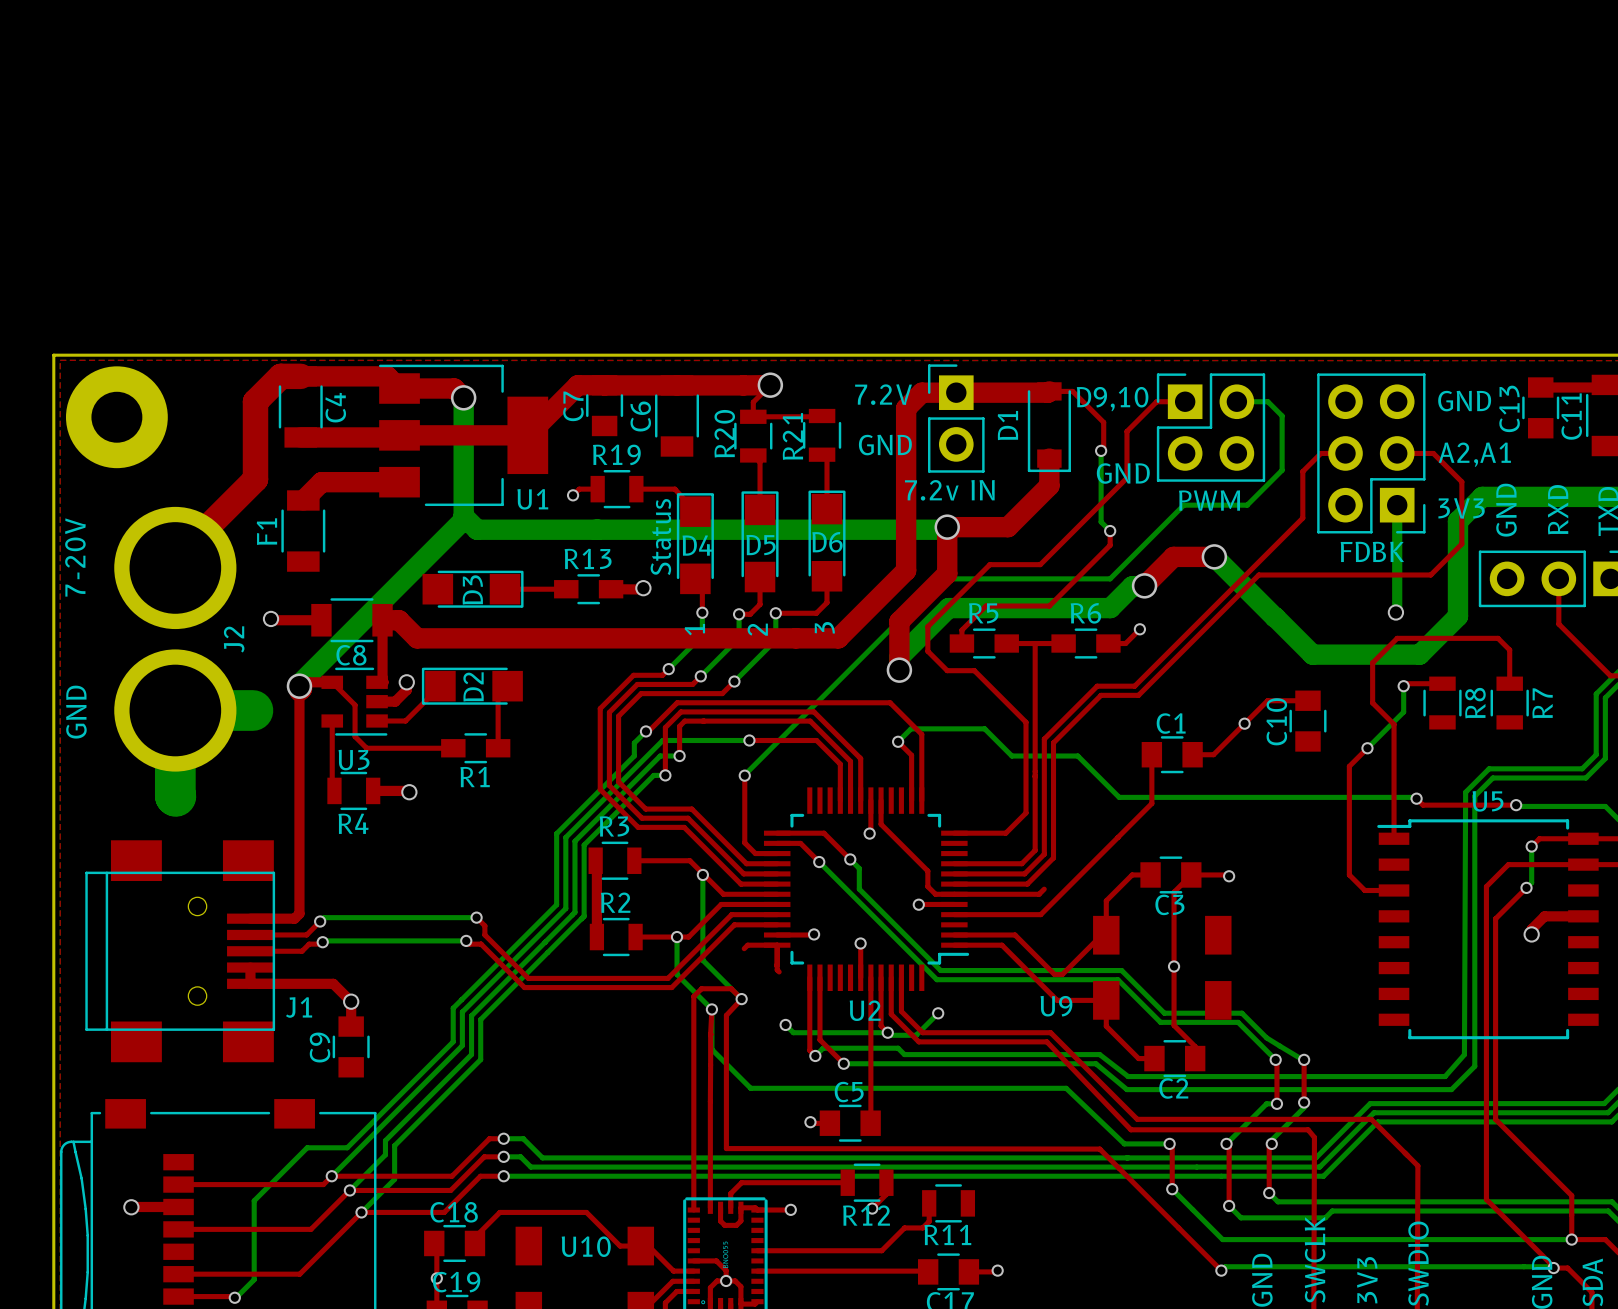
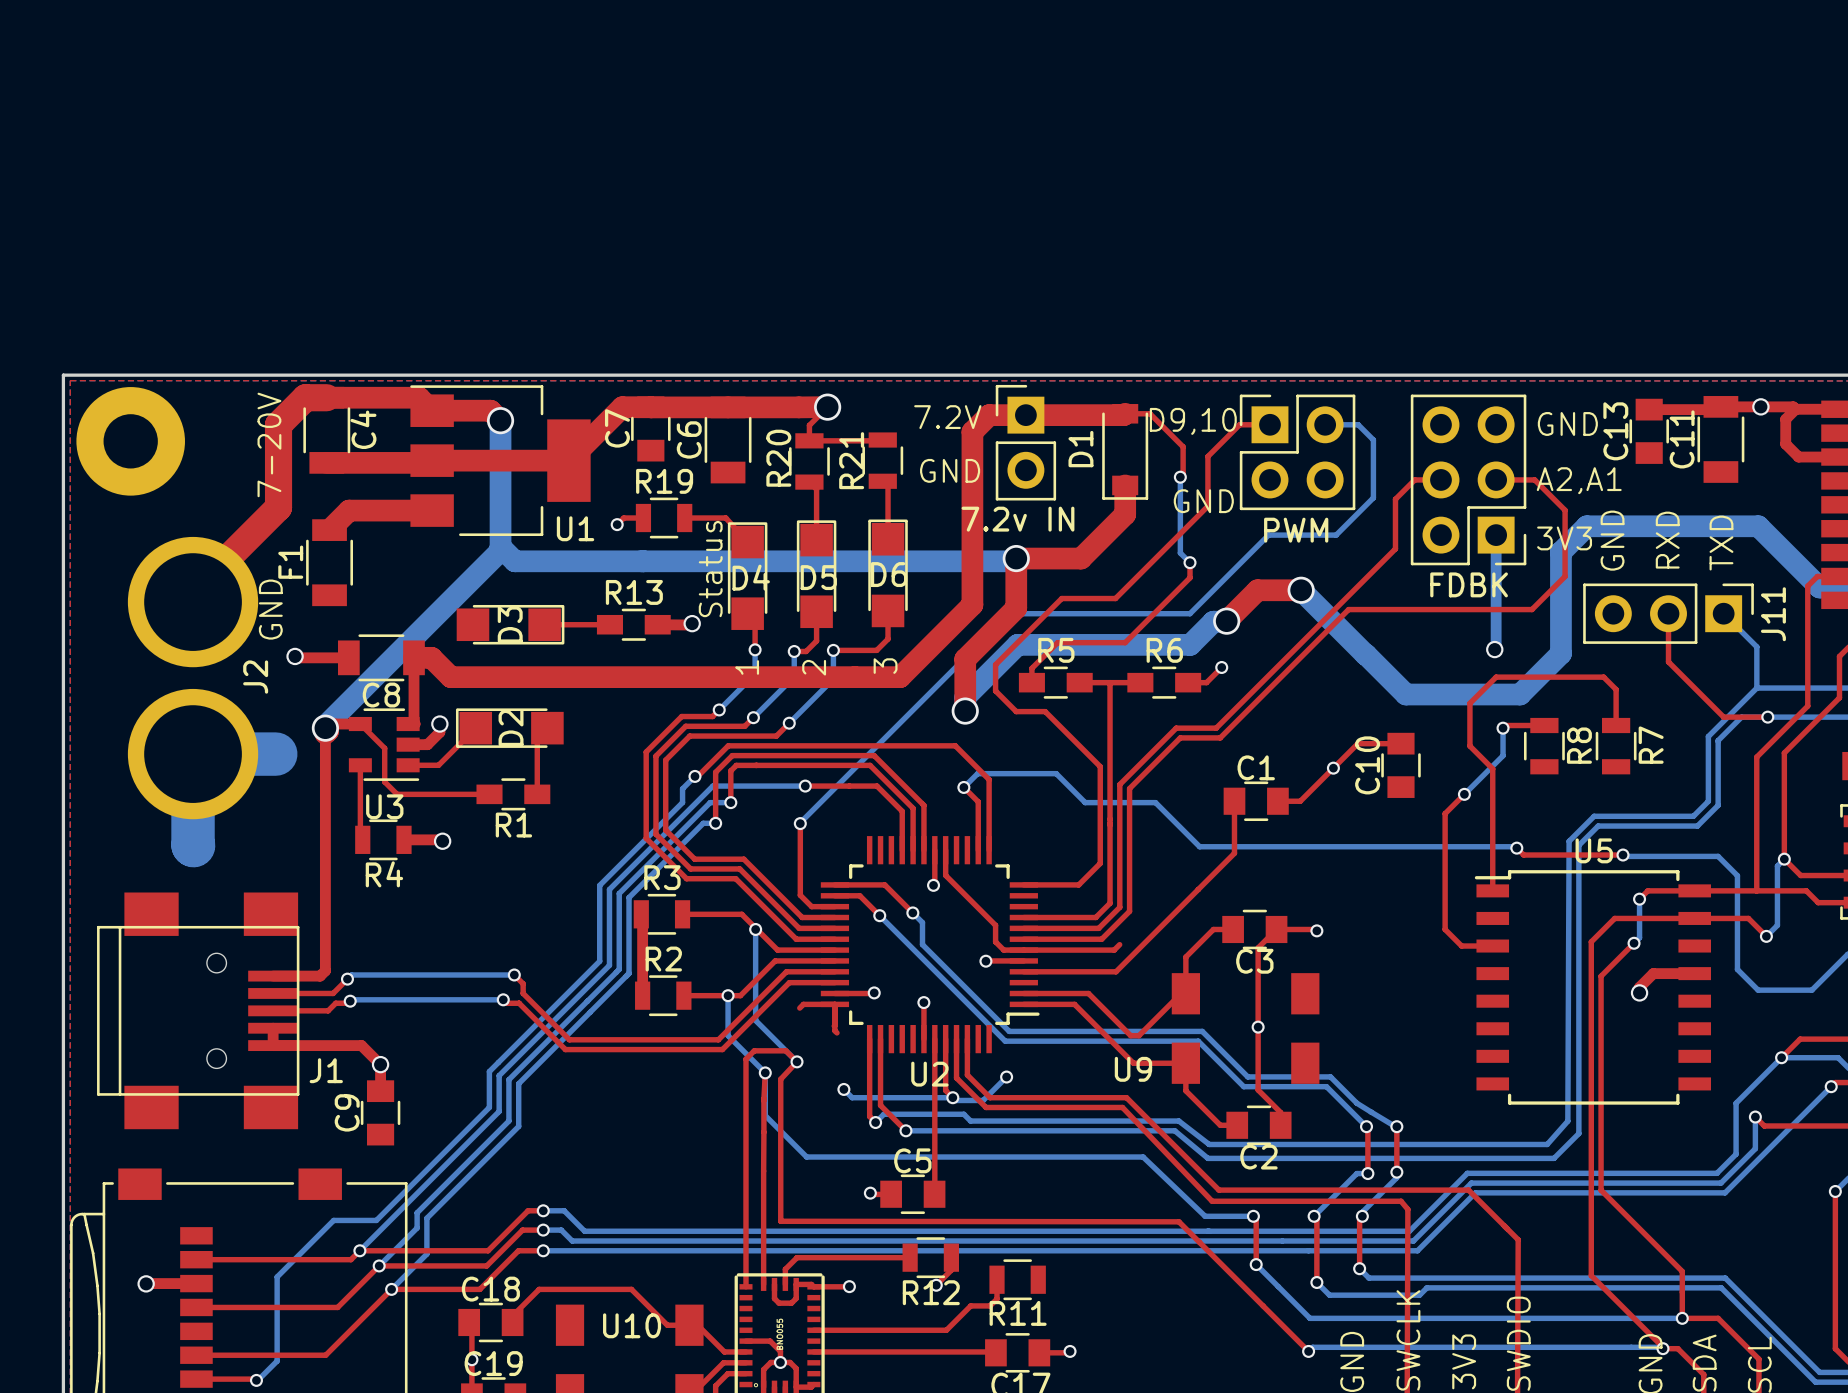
text position: 7-20V (75, 557) -> 7-20V (269, 444)
text position: GND (76, 712) -> GND (270, 609)

